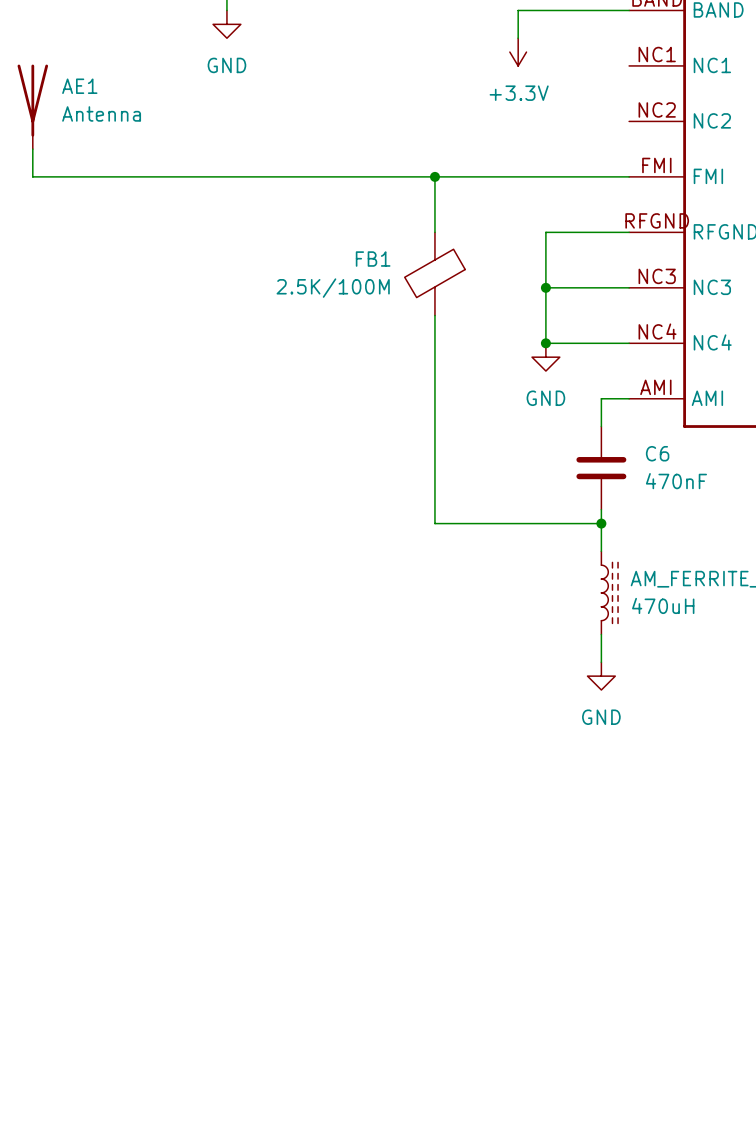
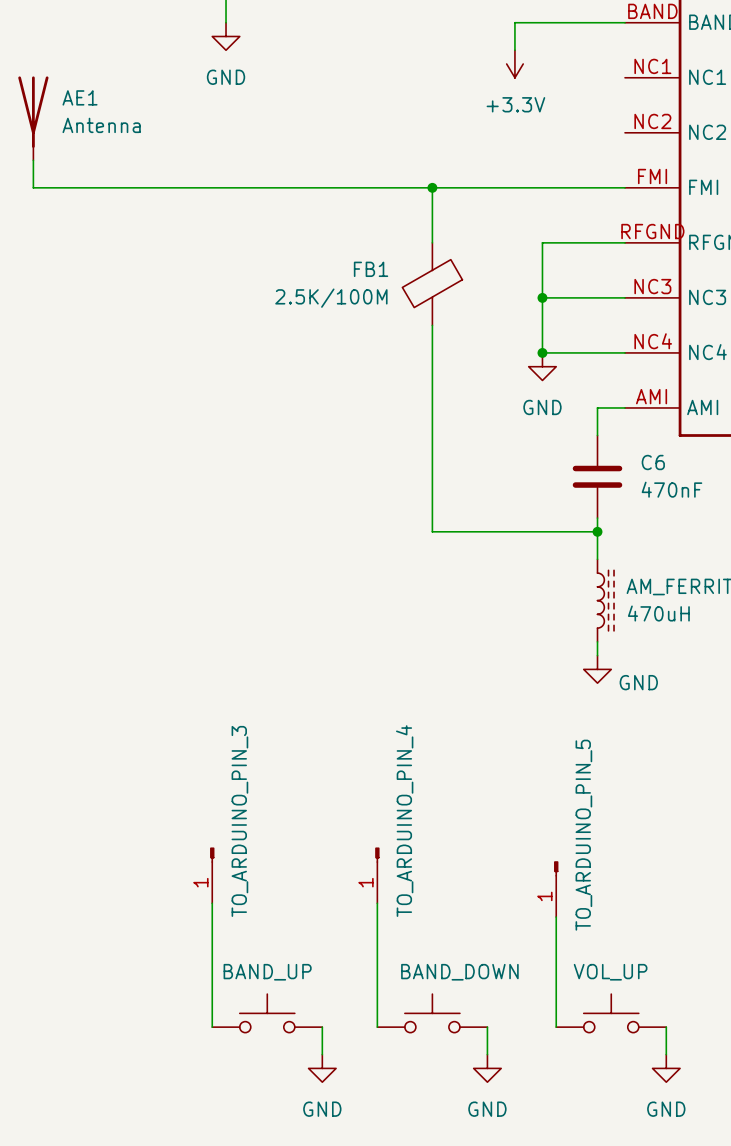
power symbol position: GND (601, 676) -> GND (597, 669)
power symbol text position: GND (601, 717) -> GND (638, 682)
part: none -> TO_ARDUINO_PIN_3 (212, 875)
part: none -> TO_ARDUINO_PIN_4 (377, 875)
part: none -> TO_ARDUINO_PIN_5 (556, 889)
wire: none -> (212, 903) (212, 1027)
wire: none -> (377, 903) (377, 1027)
wire: none -> (556, 917) (556, 1027)
part: none -> BAND_UP (267, 1013)
part: none -> BAND_DOWN (432, 1013)
part: none -> VOL_UP (611, 1013)
wire: none -> (322, 1027) (322, 1054)
wire: none -> (487, 1027) (487, 1054)
wire: none -> (666, 1027) (666, 1054)
power symbol: none -> GND (322, 1068)
power symbol: none -> GND (487, 1068)
power symbol: none -> GND (666, 1068)

